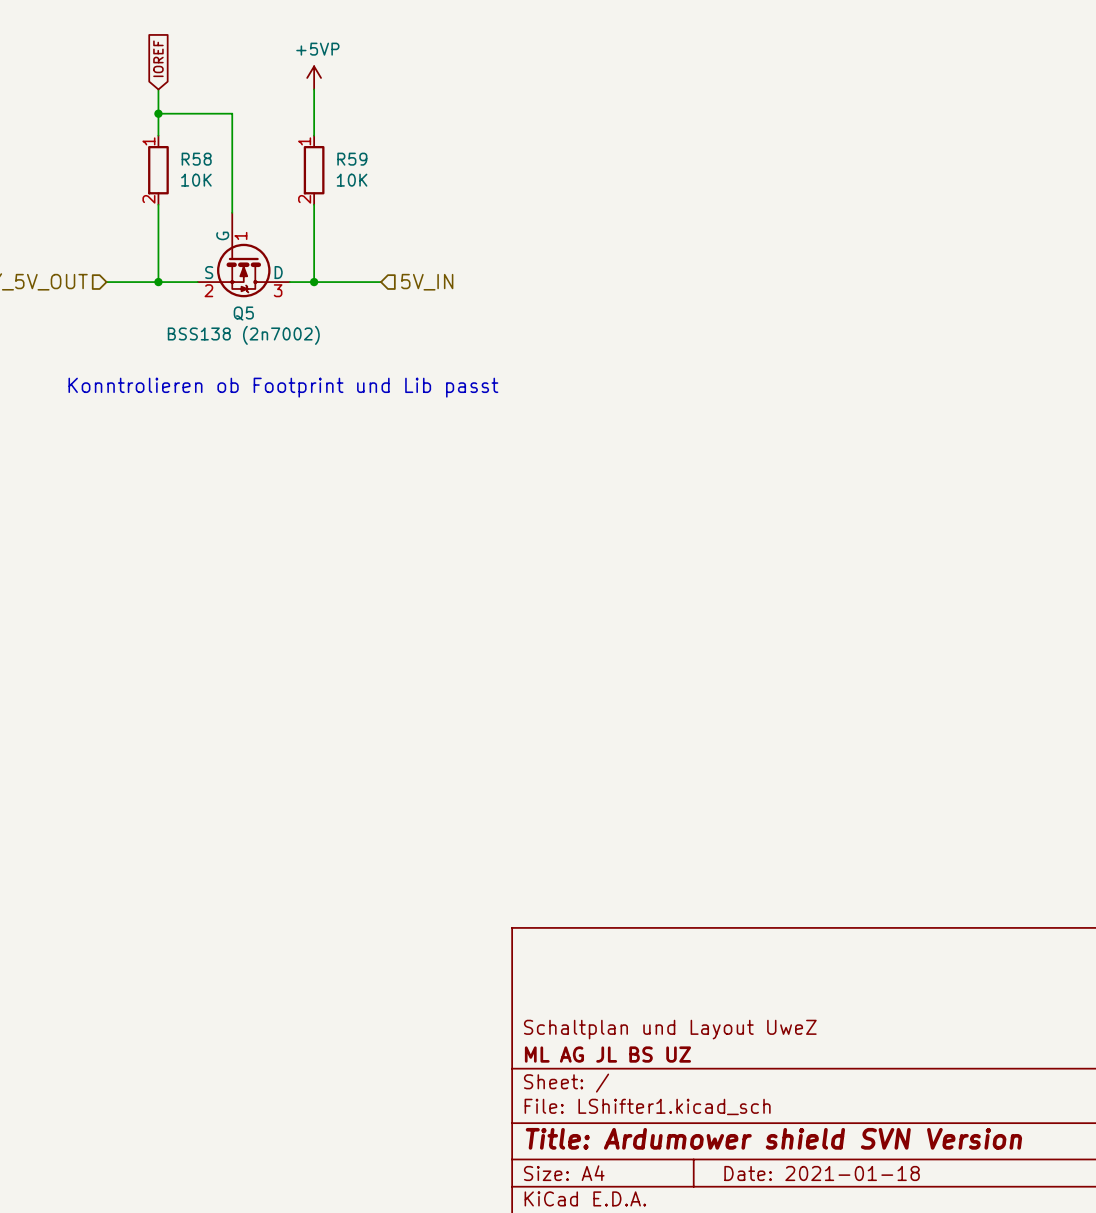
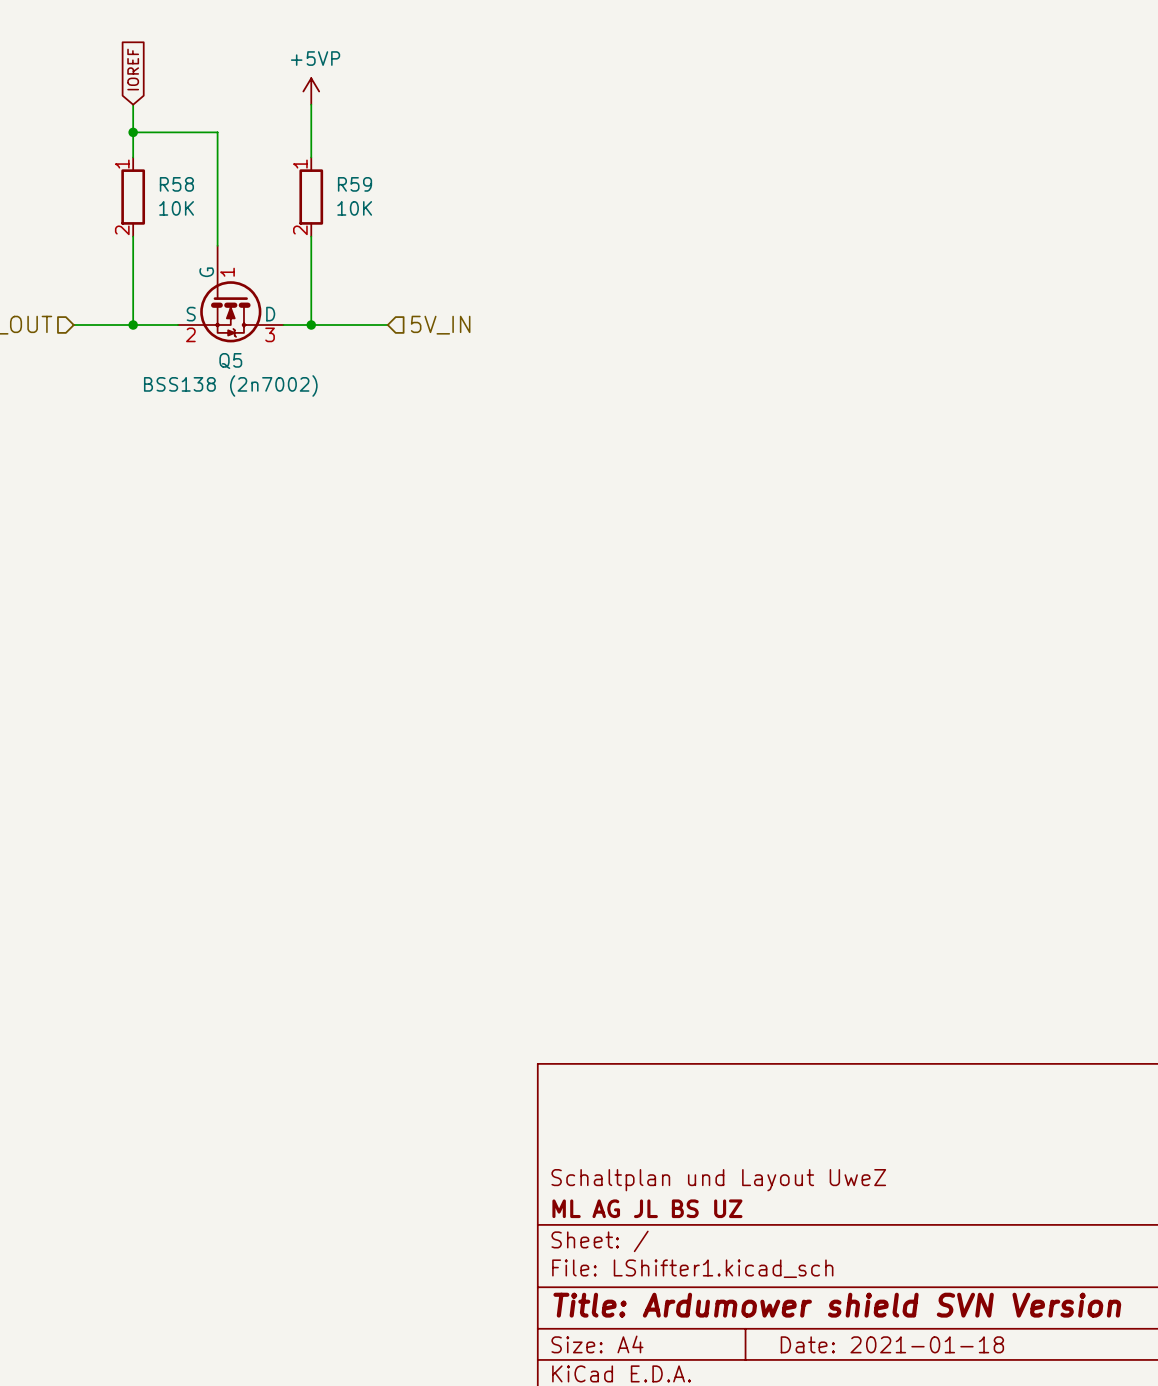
text: Konntrolieren ob Footprint und Lib passt (283, 387) -> none

